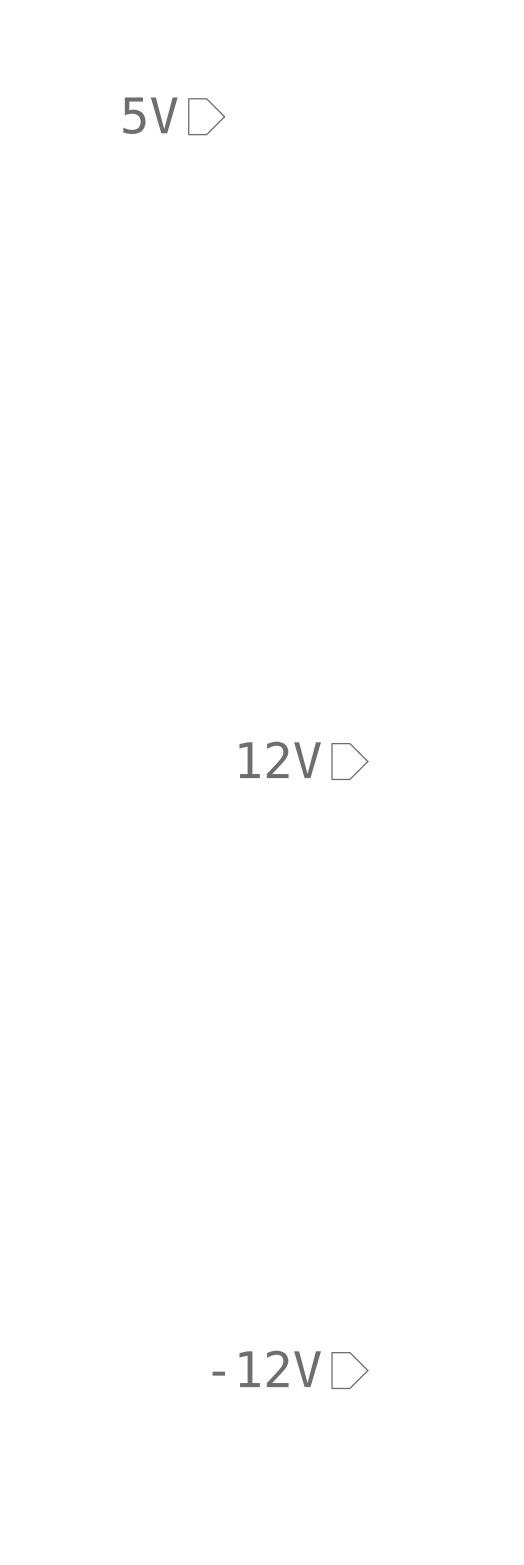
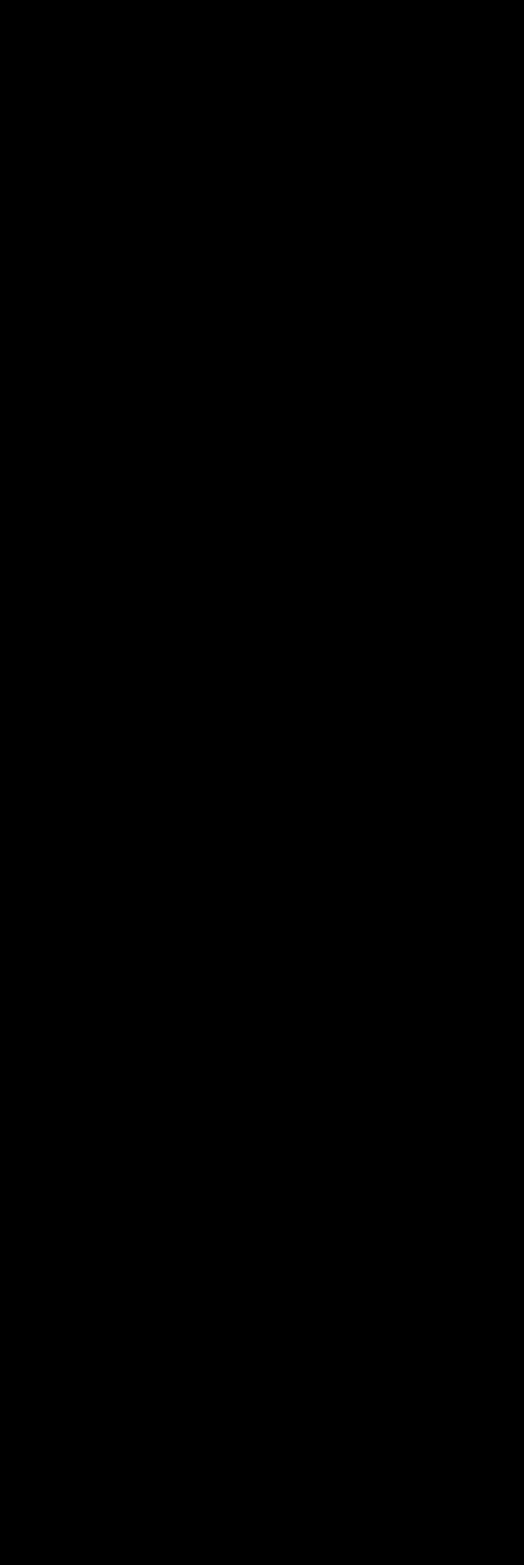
hierarchical label: 5V (150, 115) -> none
hierarchical label: 12V (280, 759) -> none
hierarchical label: -12V (266, 1368) -> none

